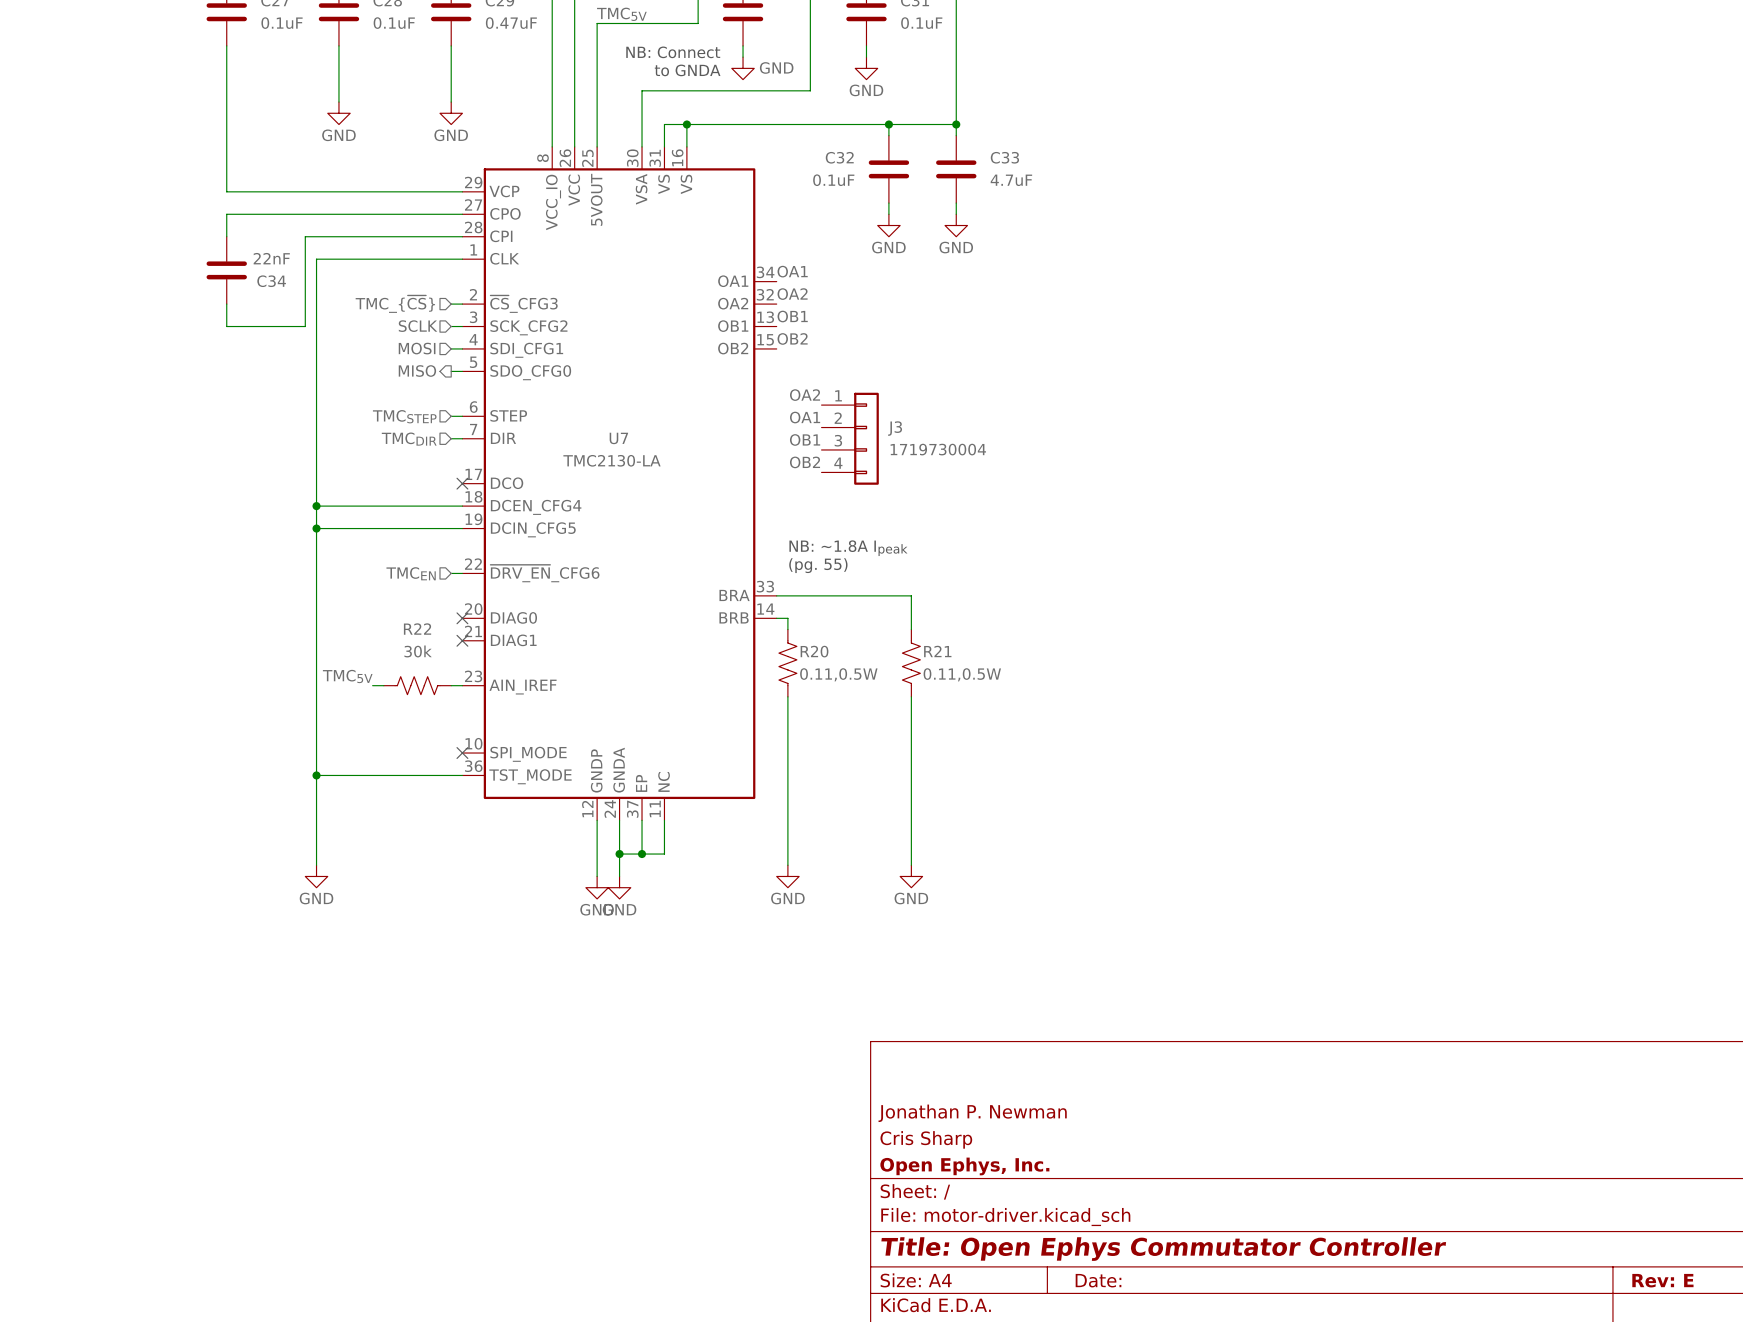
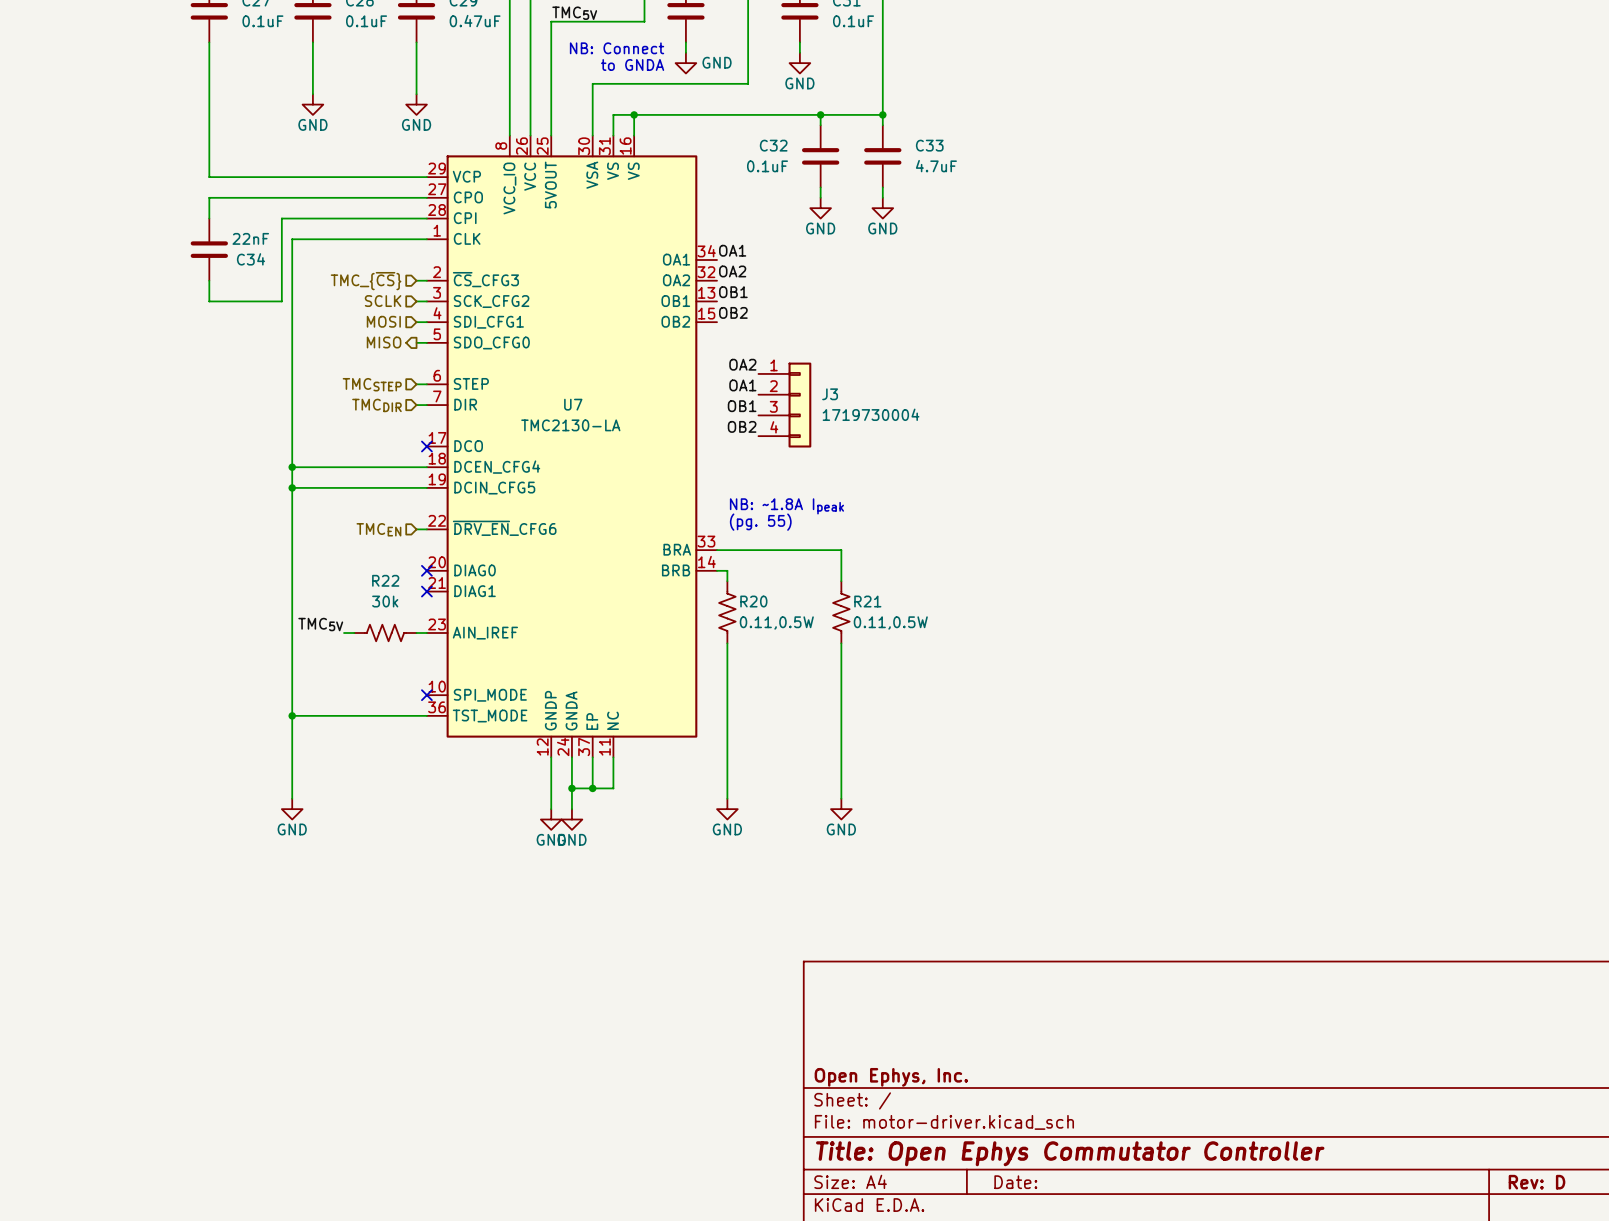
title block: Jonathan P. Newman (972, 1113) -> none
title block: Cris Sharp (926, 1139) -> none
title block: Rev: E (1662, 1280) -> Rev: D (1537, 1182)

